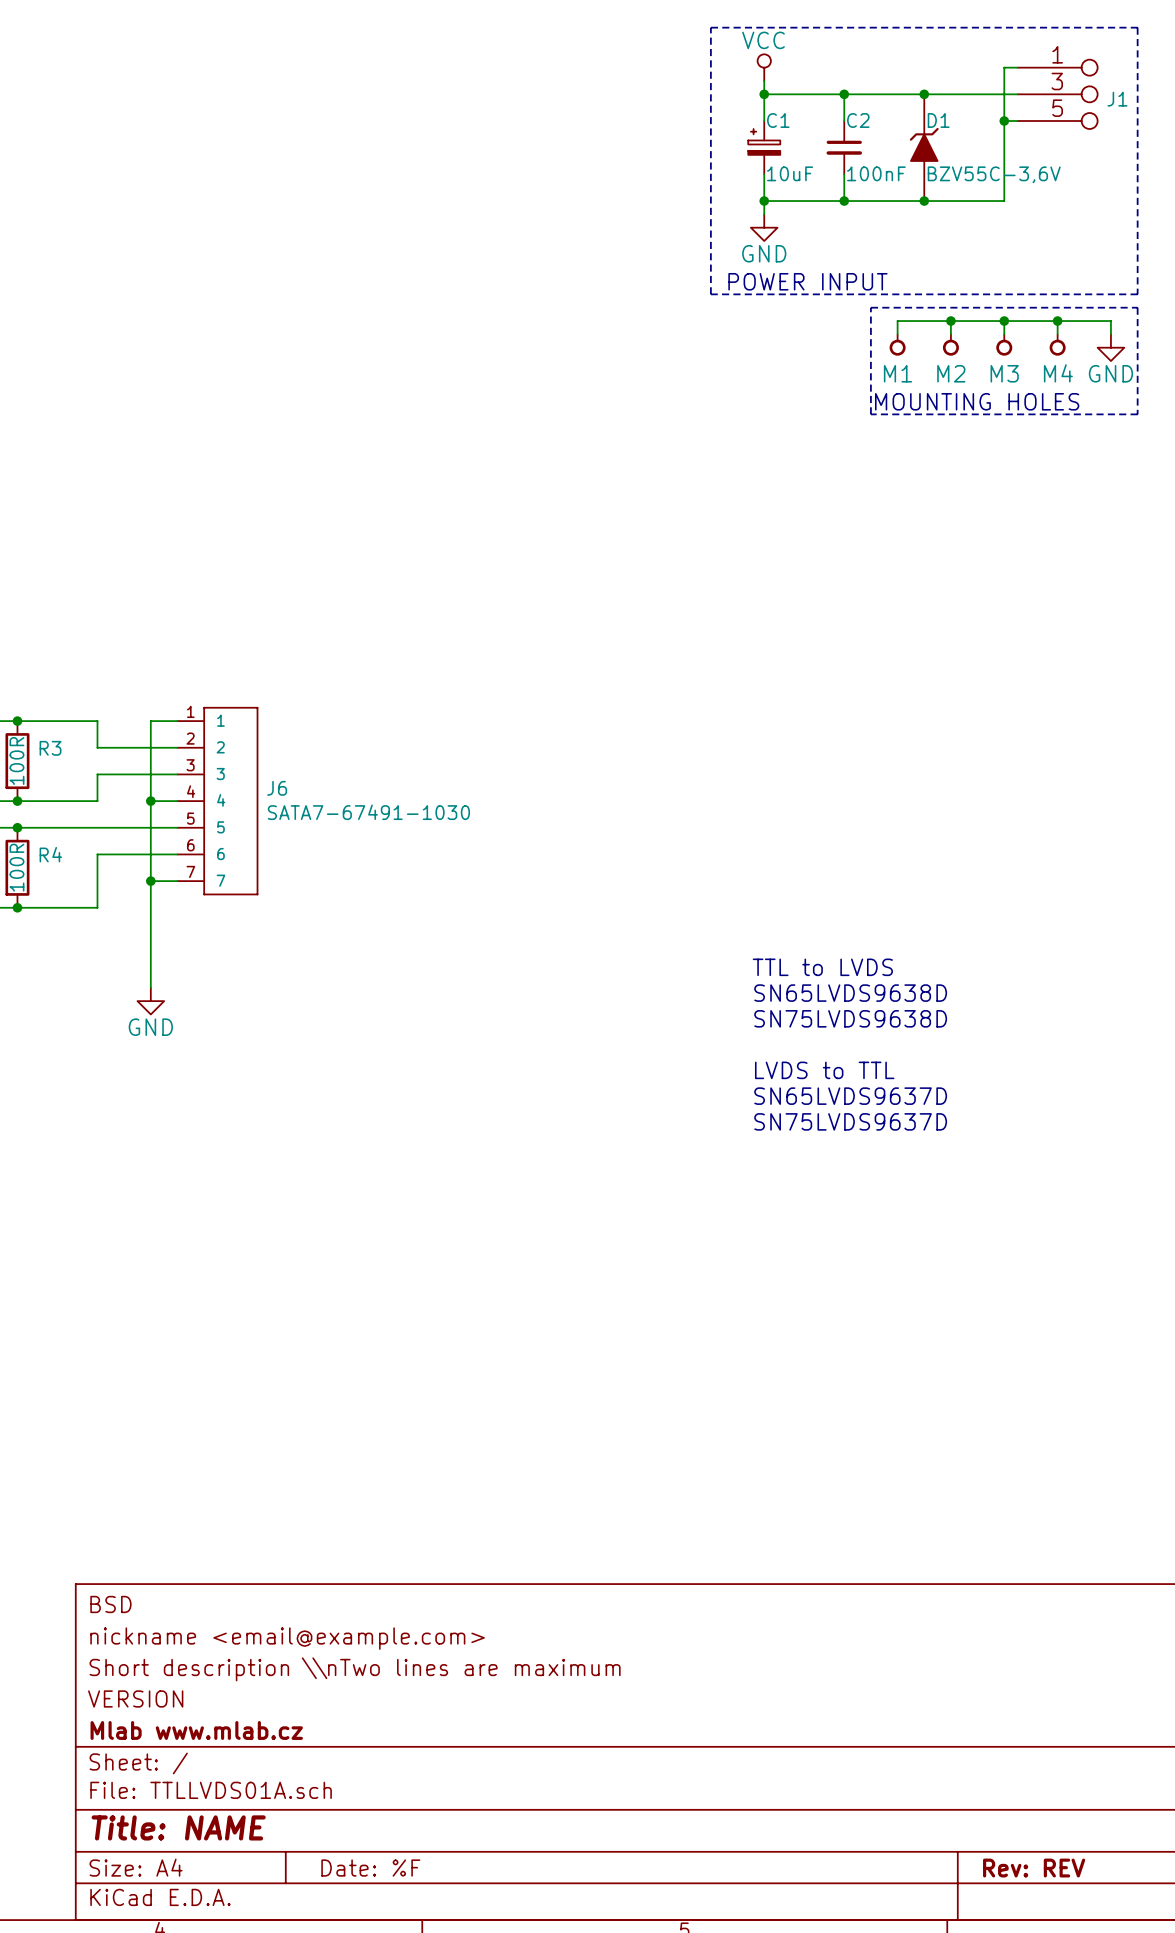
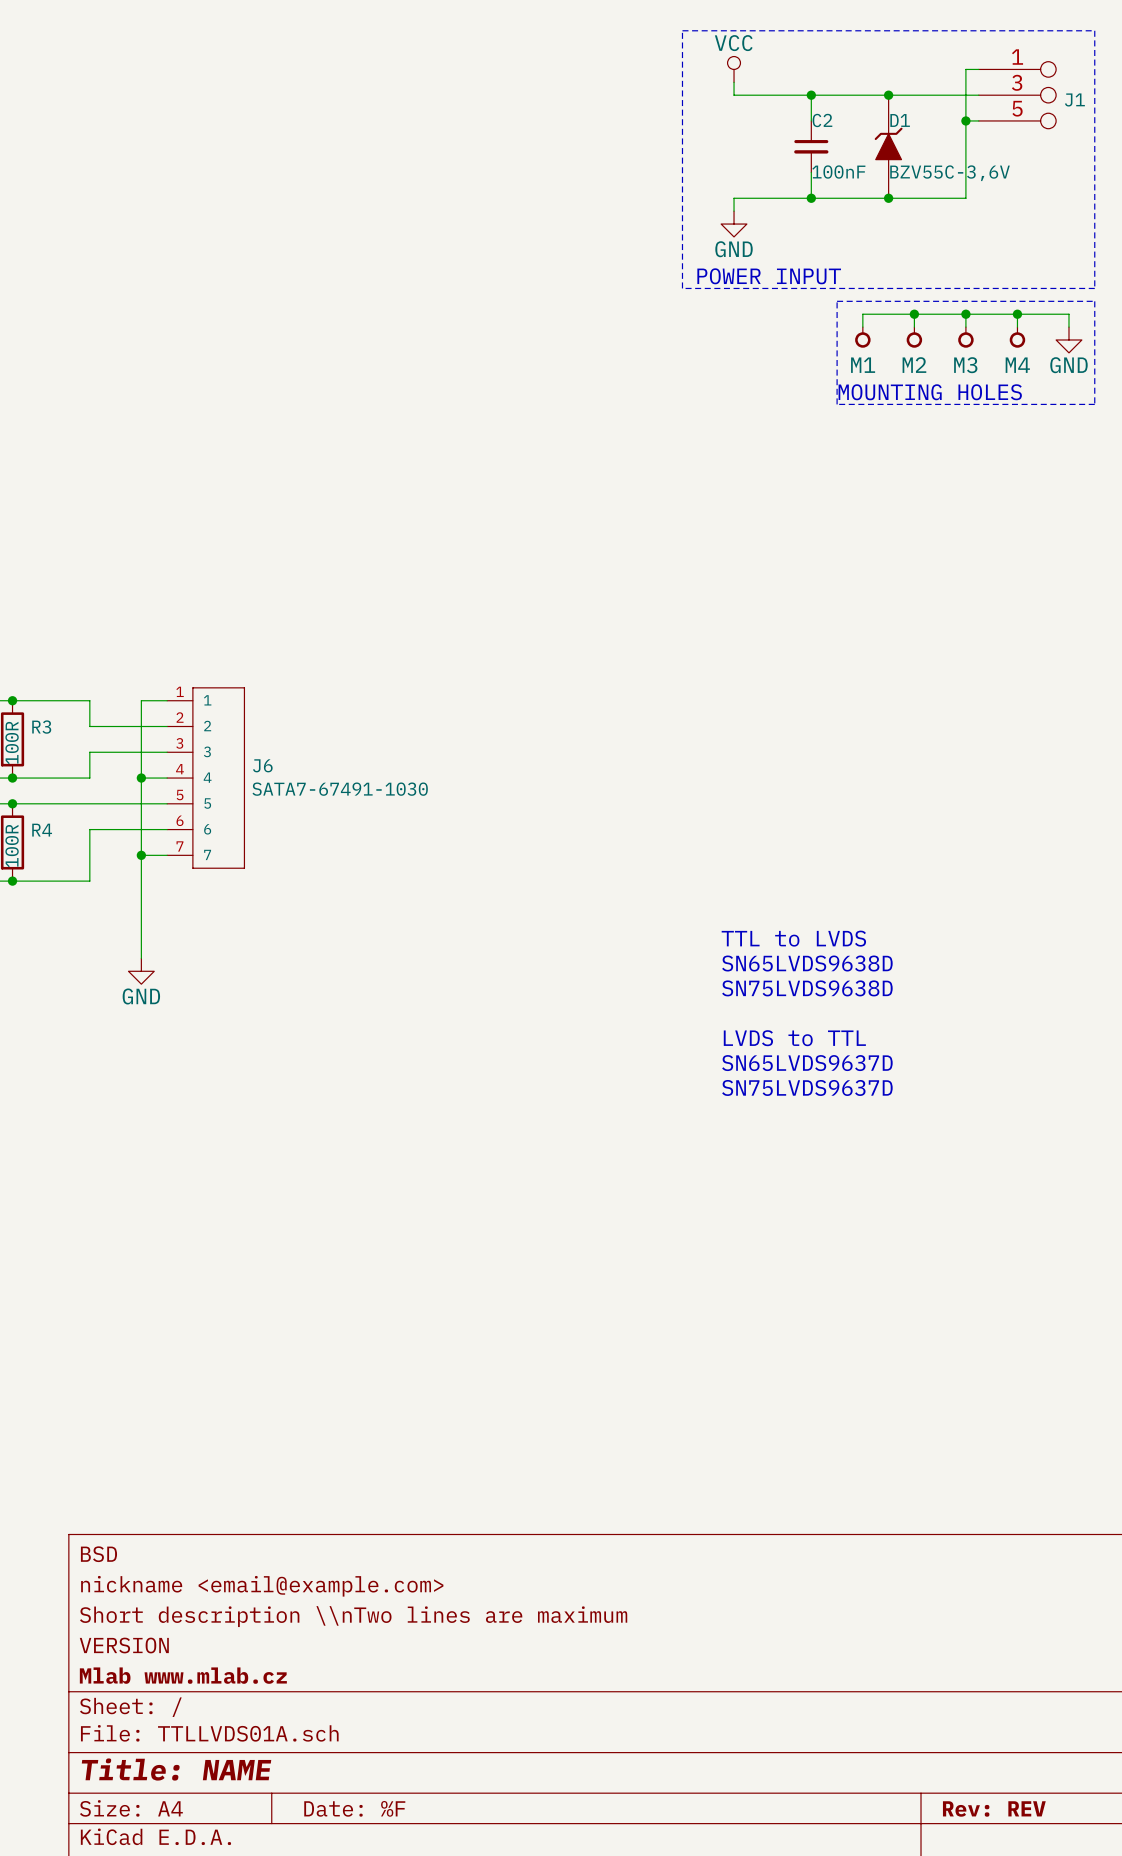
wire: (764, 94) (764, 121) -> none
junction: (764, 94) -> none
C1: 10uF (764, 147) -> none
wire: (764, 174) (764, 201) -> none
junction: (764, 201) -> none

